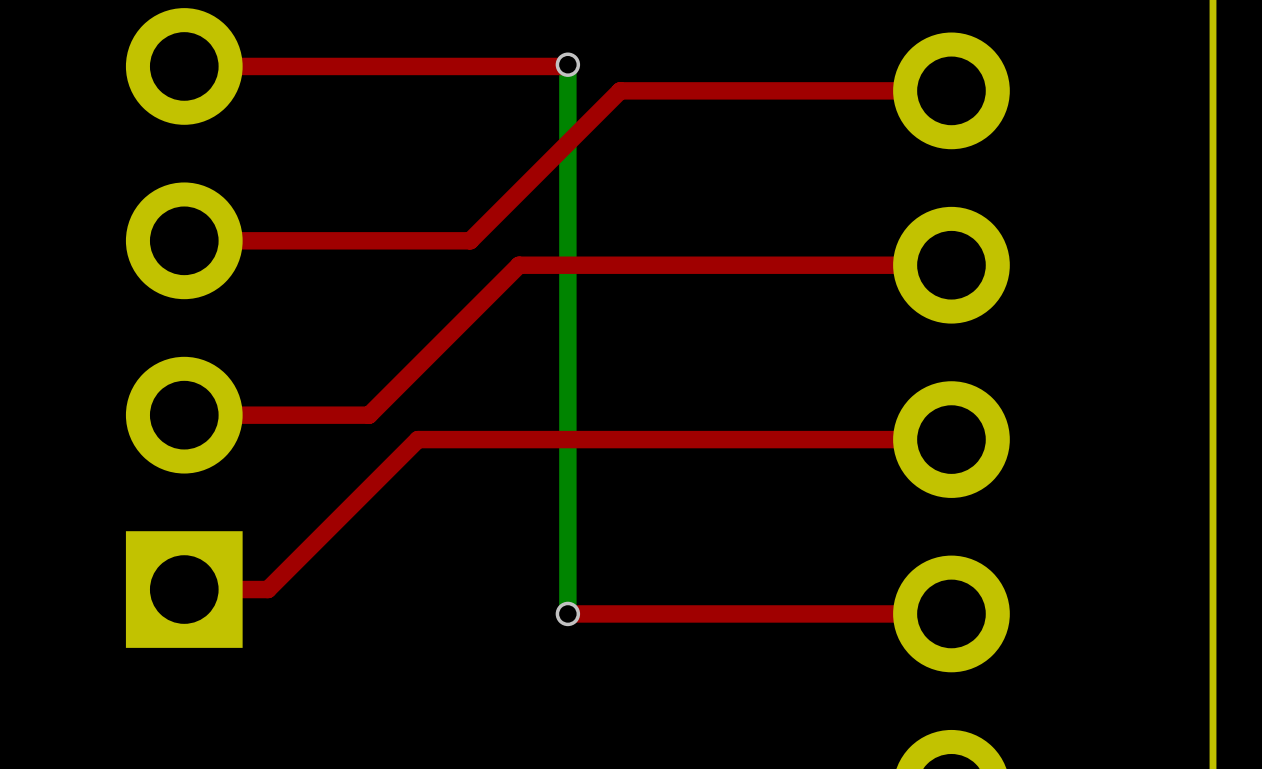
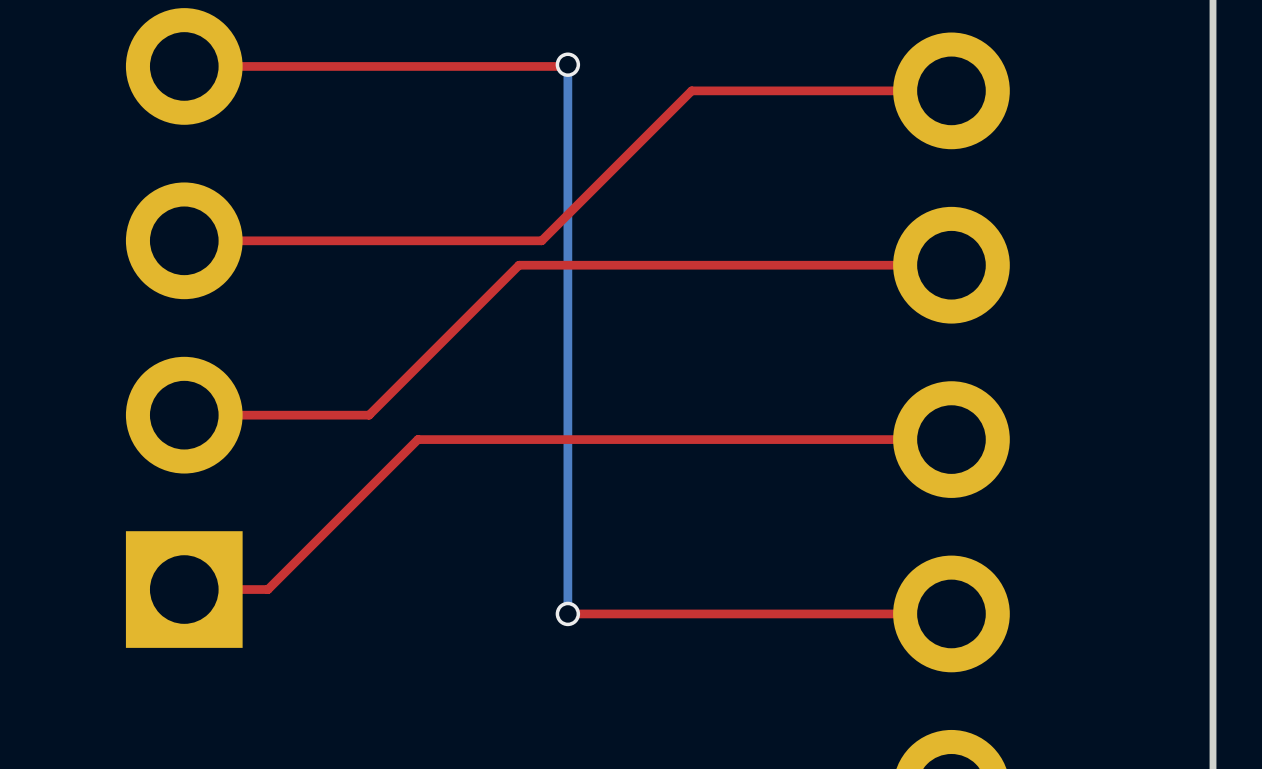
bottom track width: thick (567, 64) (567, 613) -> thin (567, 64) (567, 613)
top track width: thick (184, 66) (566, 66) -> thin (184, 66) (566, 66)
top track: (691, 90) (620, 90) (470, 240) -> (691, 90) (541, 240) (470, 240)
top track width: thick (691, 90) (951, 90) -> thin (691, 90) (951, 90)
top track width: thick (184, 240) (470, 240) -> thin (184, 240) (470, 240)
top track width: thick (951, 265) (519, 265) (369, 415) (184, 415) -> thin (951, 265) (519, 265) (369, 415) (184, 415)
top track width: thick (951, 439) (417, 439) (267, 589) (184, 589) -> thin (951, 439) (417, 439) (267, 589) (184, 589)
top track width: thick (567, 613) (951, 613) -> thin (567, 613) (951, 613)

